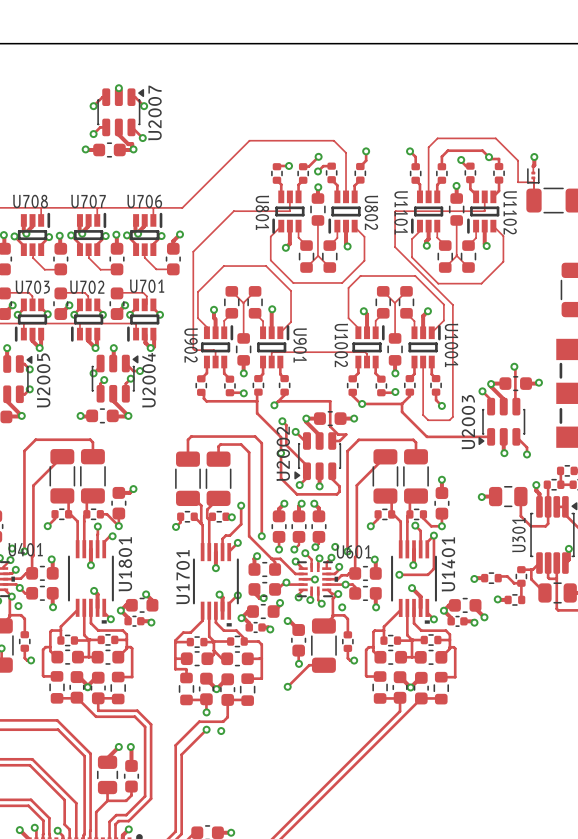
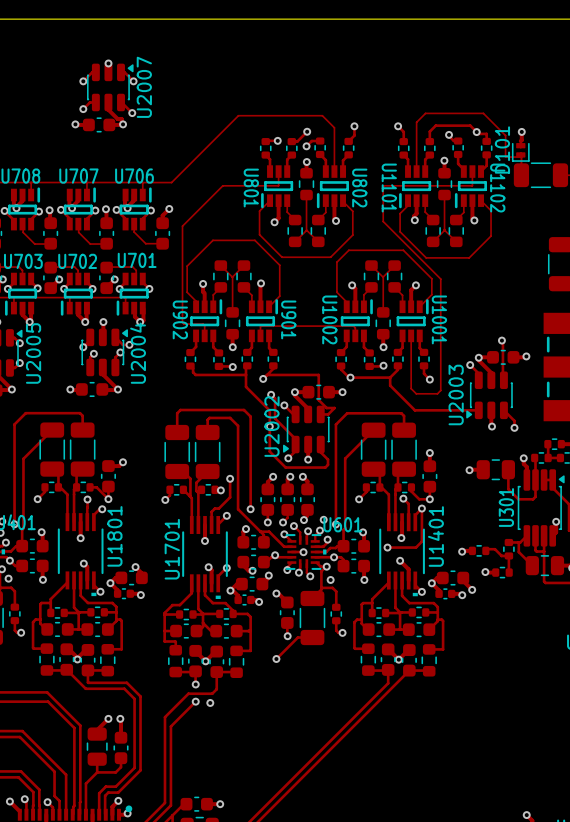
part: (533, 175) -> none
D101: none -> (520, 152)

